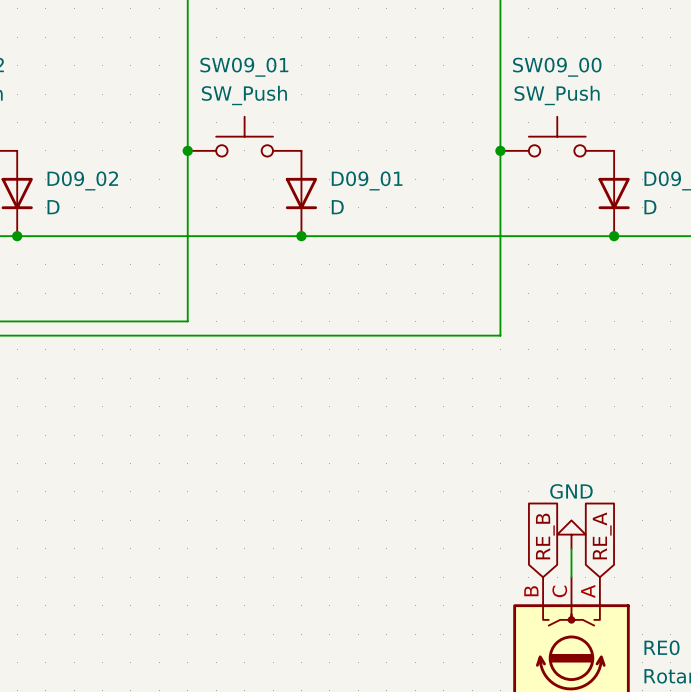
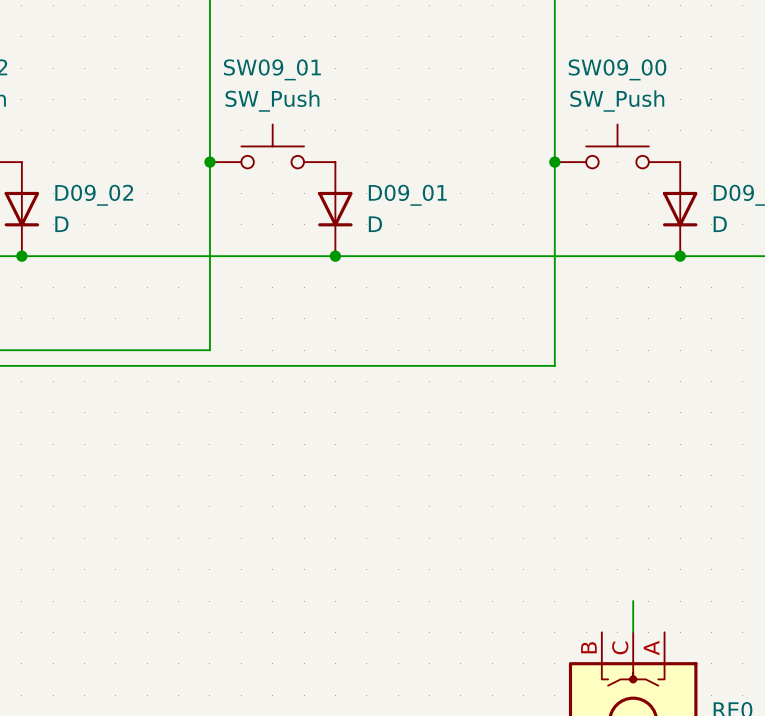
power symbol: GND (571, 534) -> none
global label: RE_A (602, 535) -> none
global label: RE_B (545, 536) -> none

